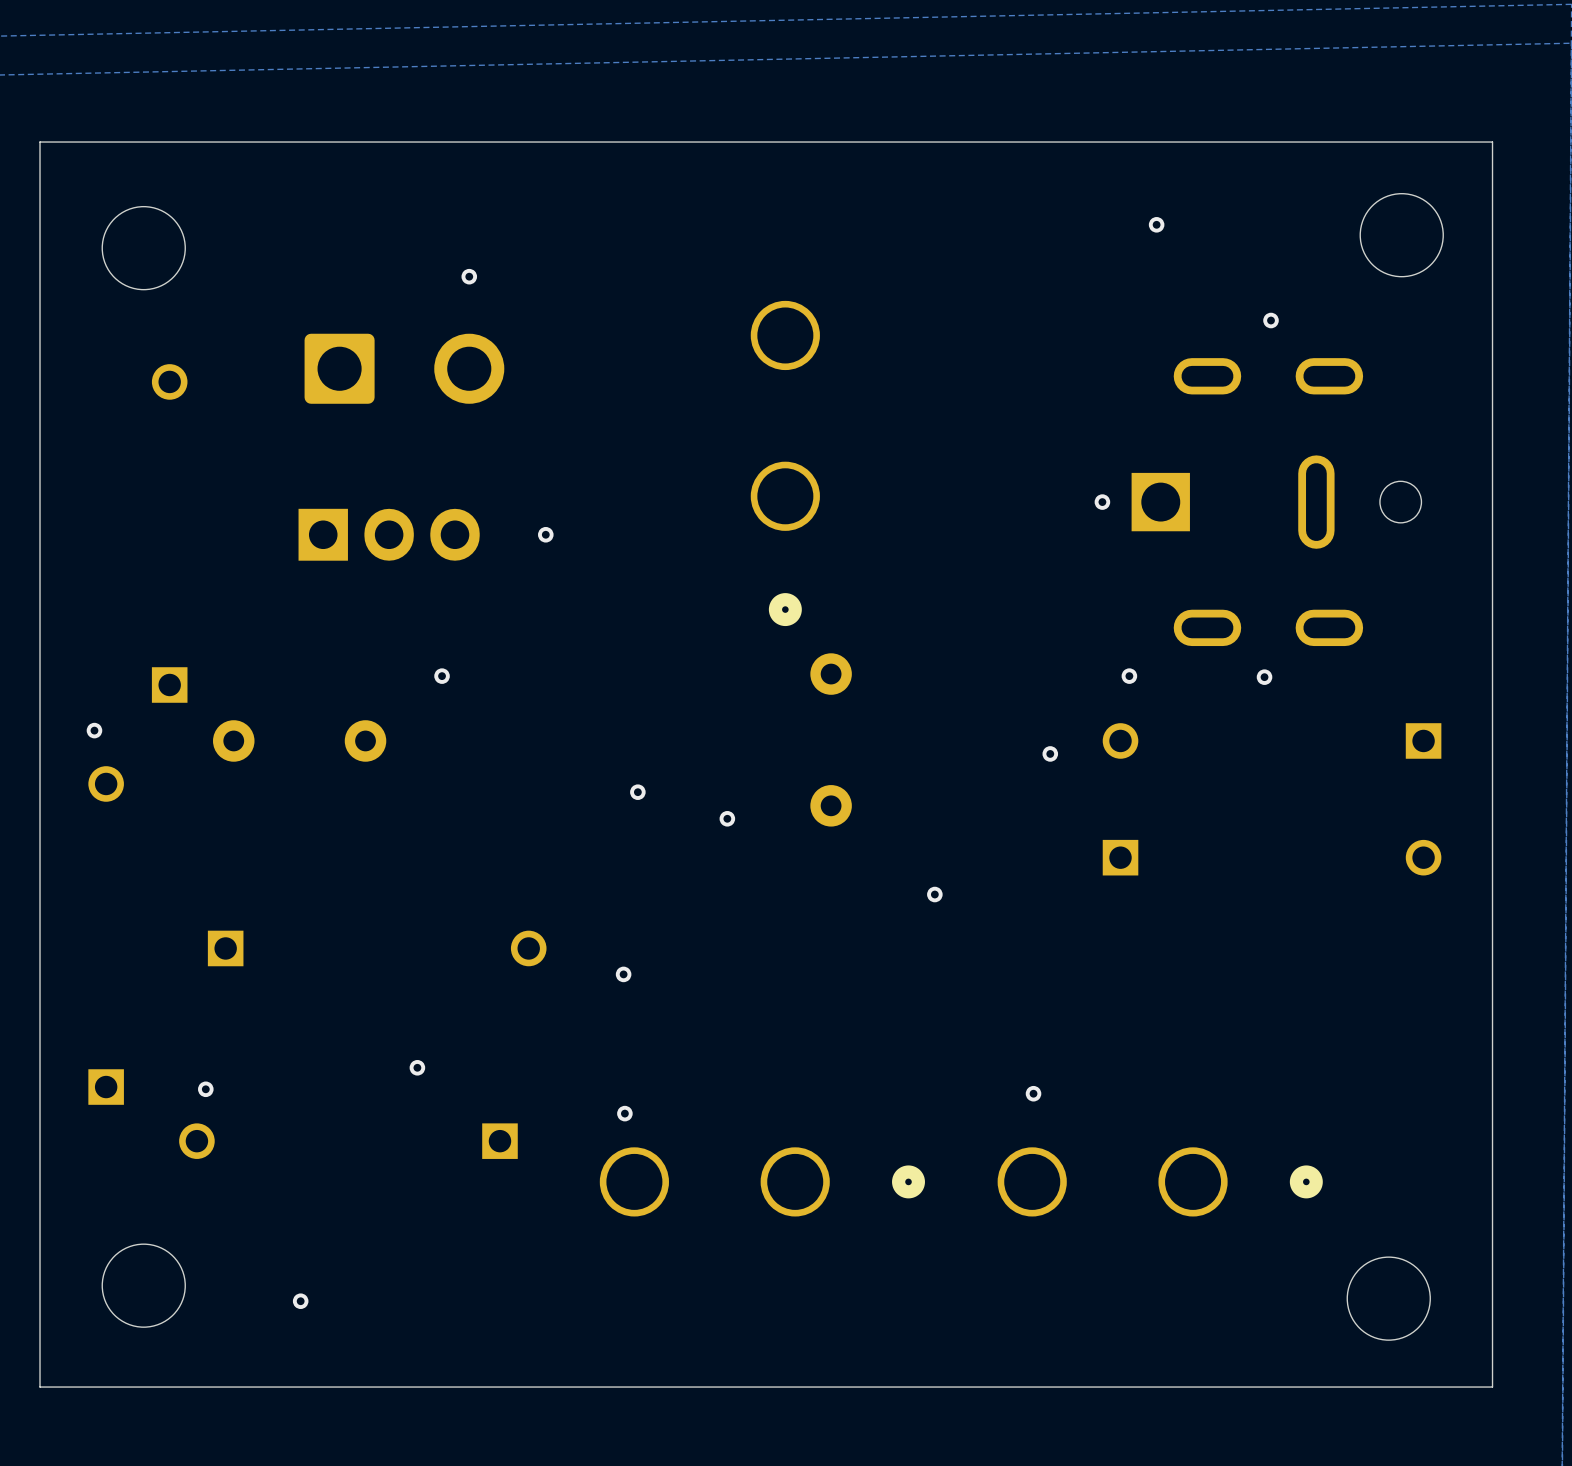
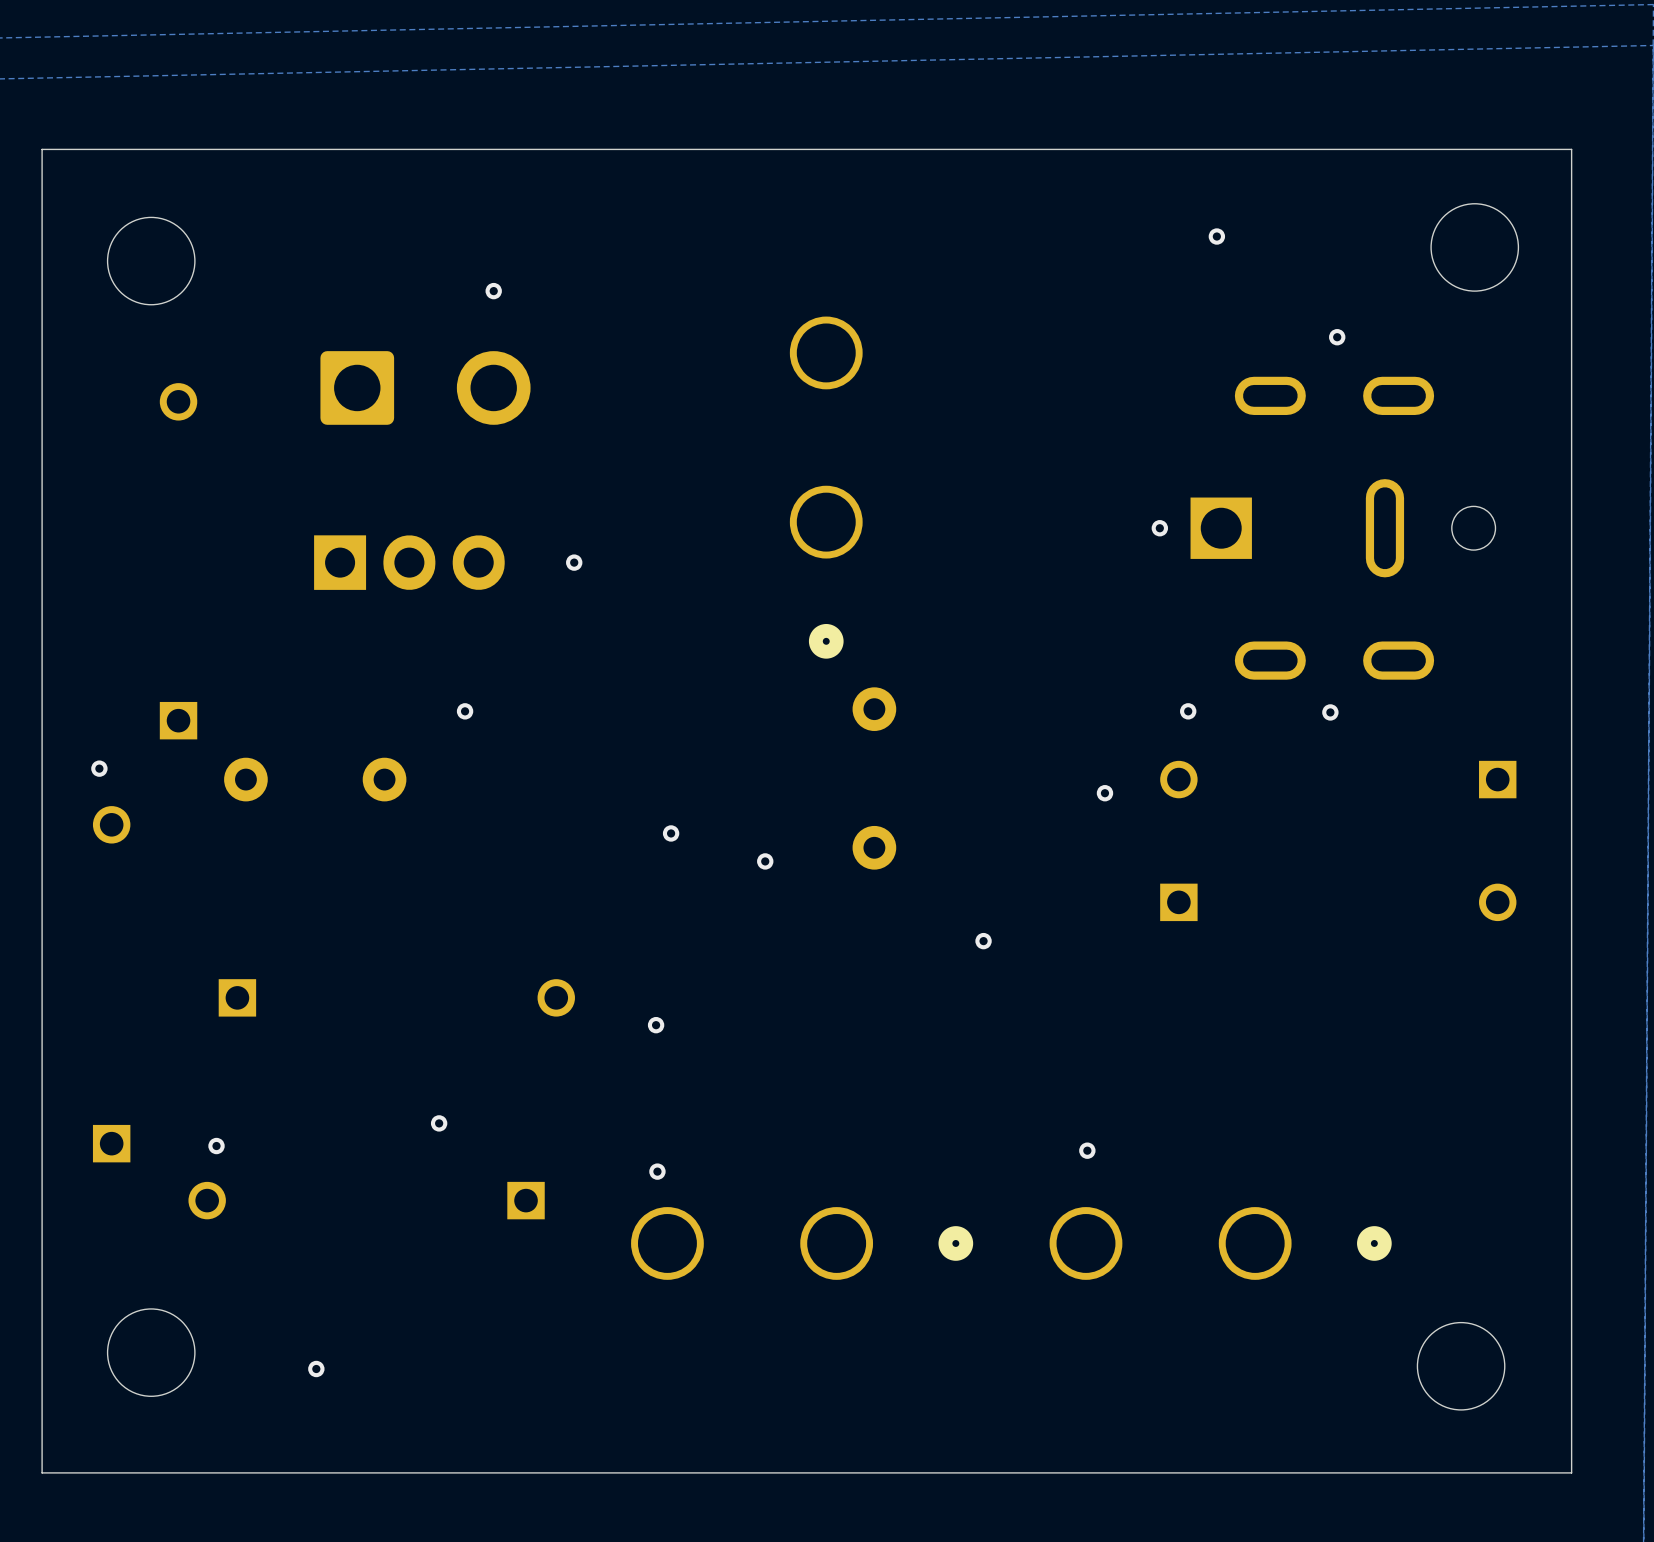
board edge: (1492, 142) (1492, 1387) (40, 1387) -> (1570, 149) (1571, 1472) (42, 1472) (42, 1459)

